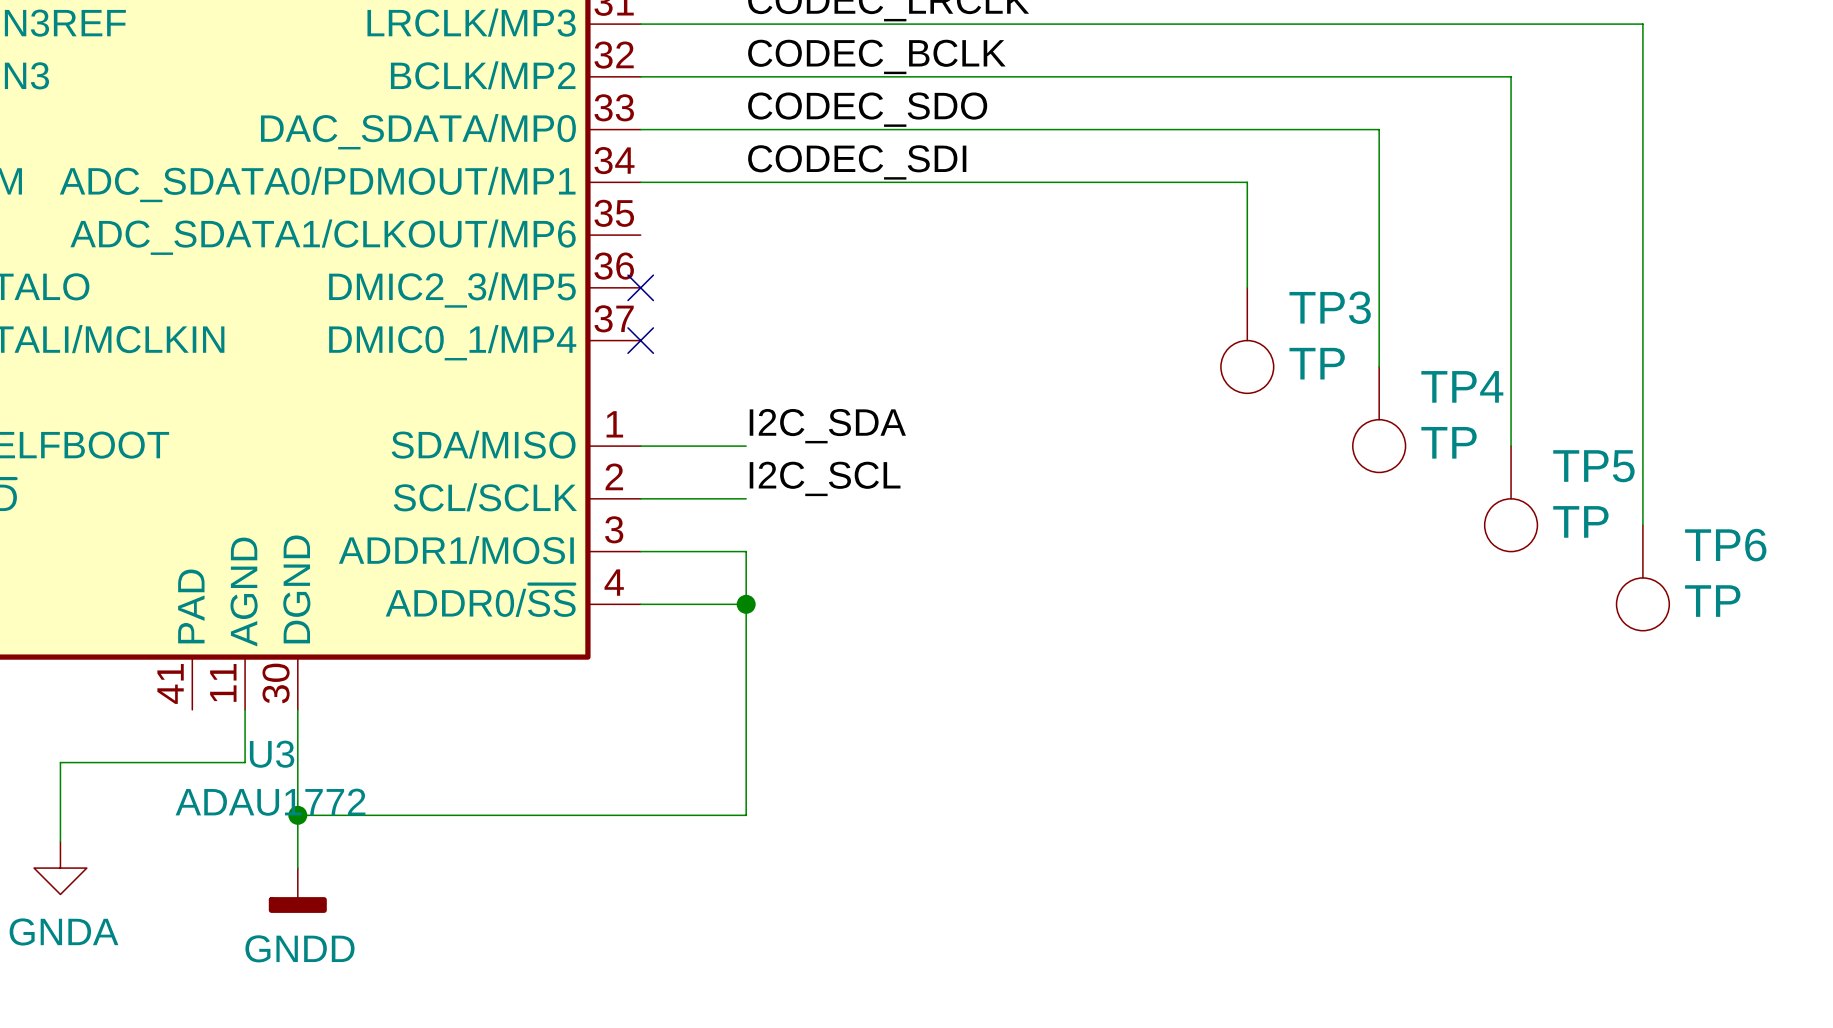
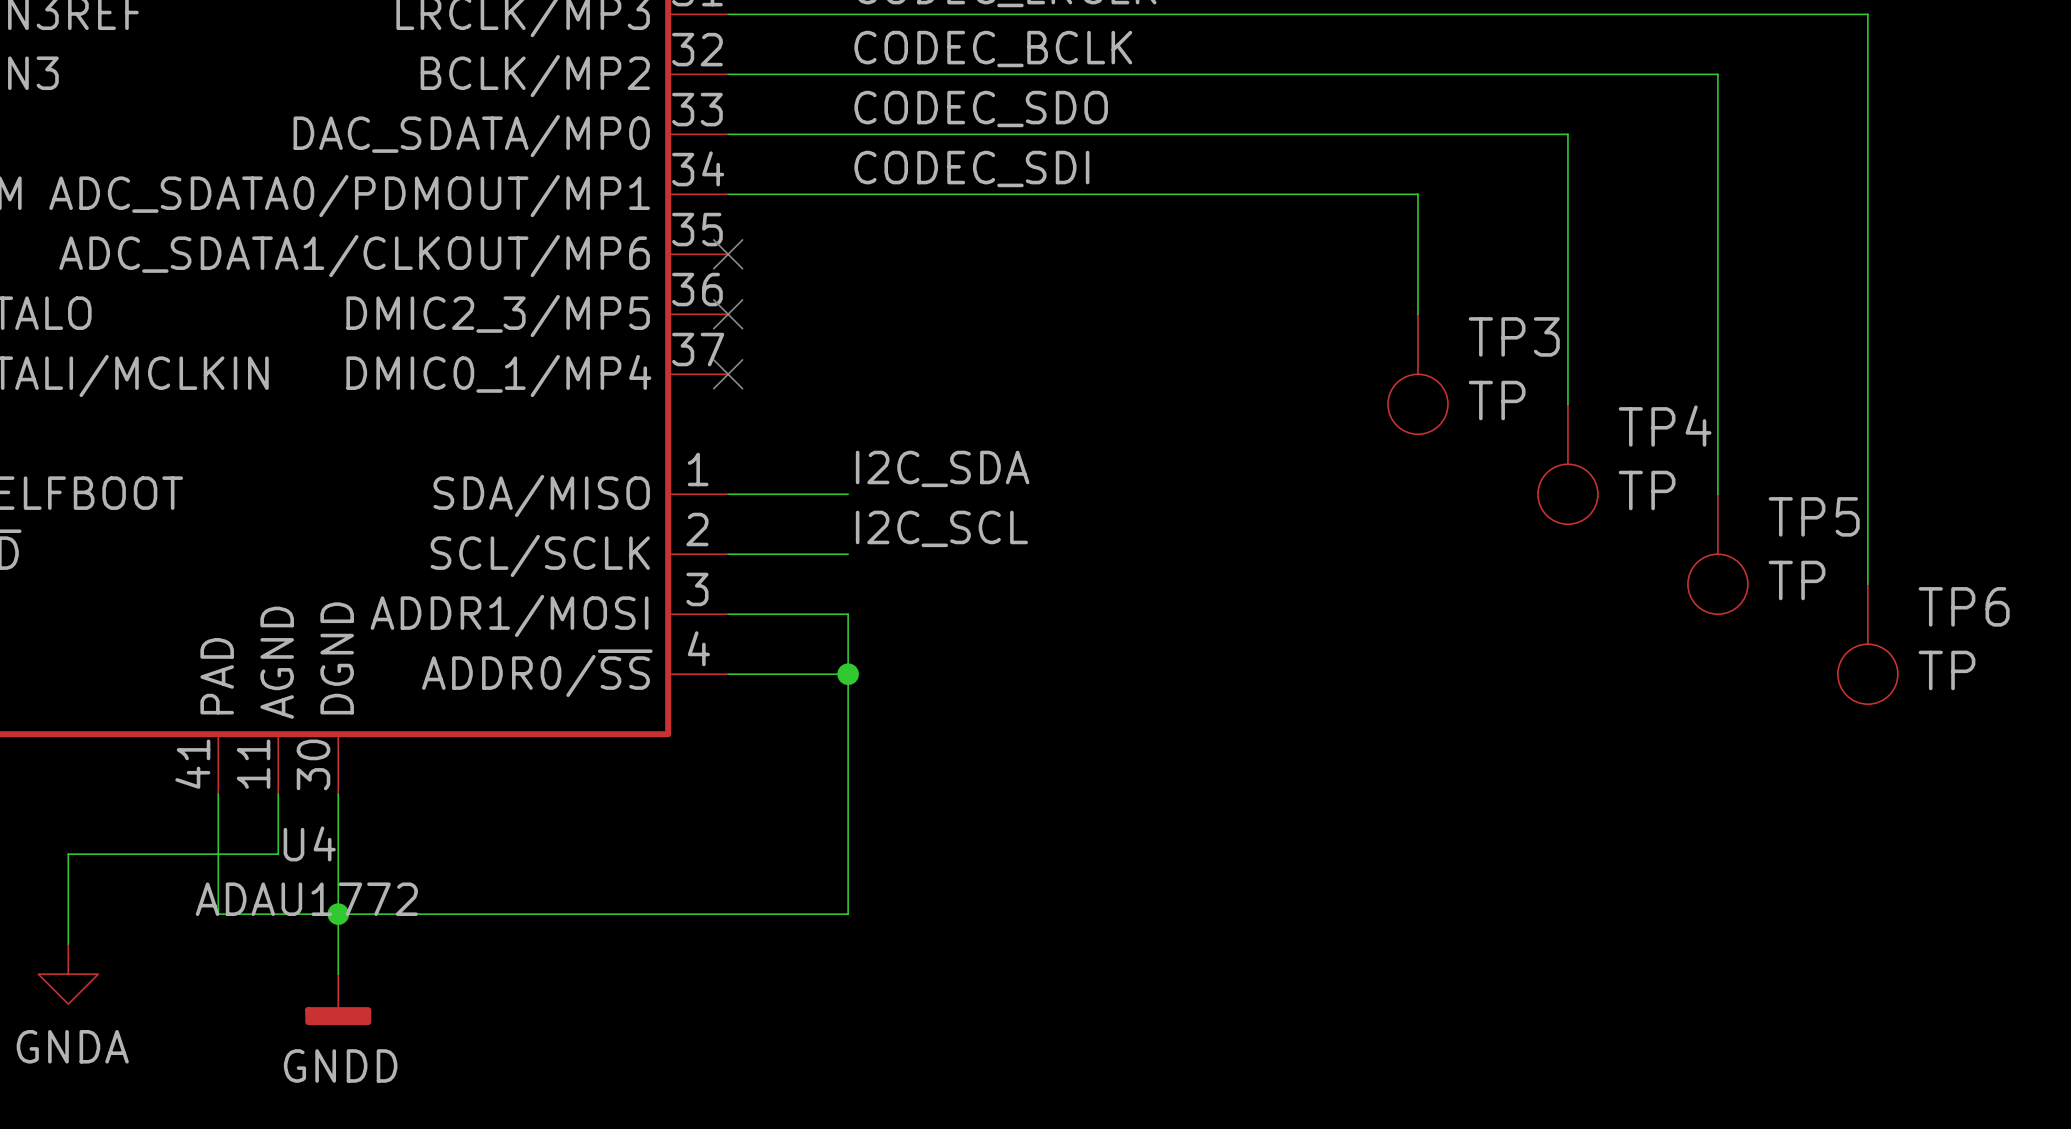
no-connect mark: none -> (728, 254)
wire: none -> (218, 794) (218, 914) (338, 914)
U3 name: U3 (272, 754) -> U4 (309, 843)

